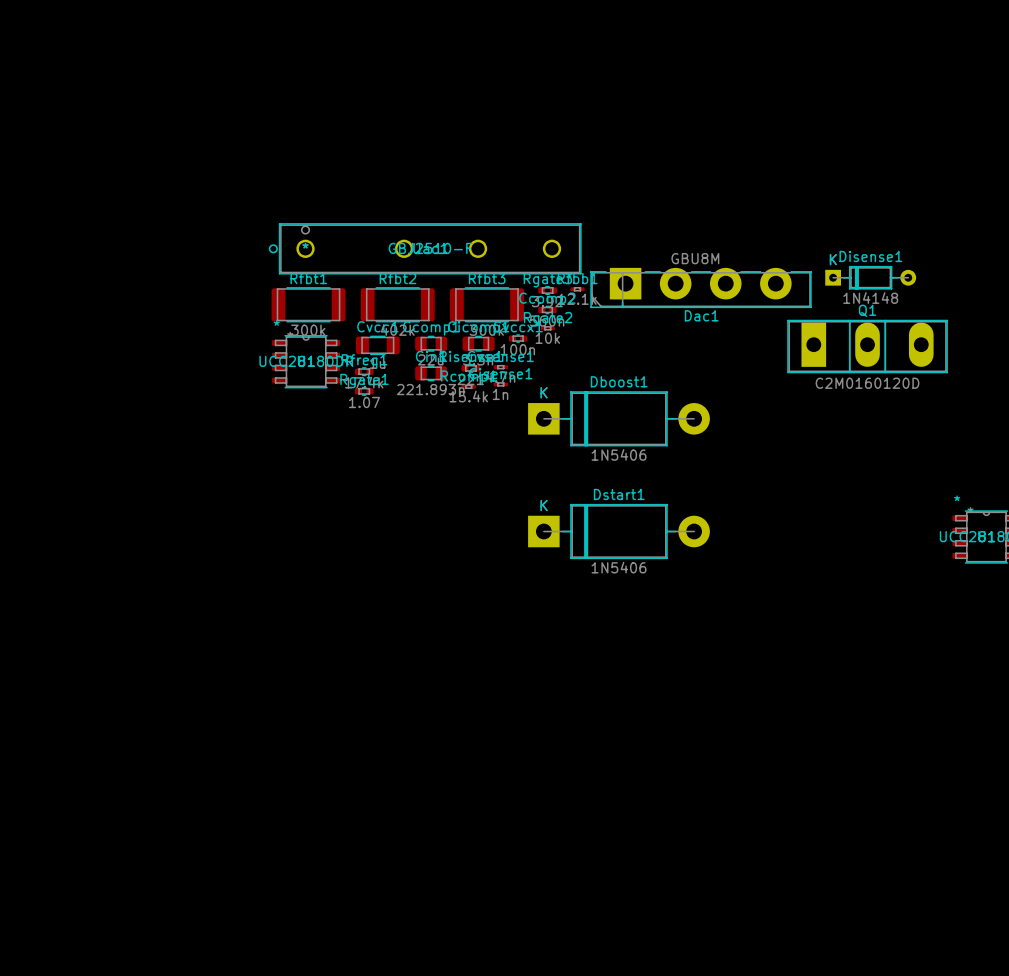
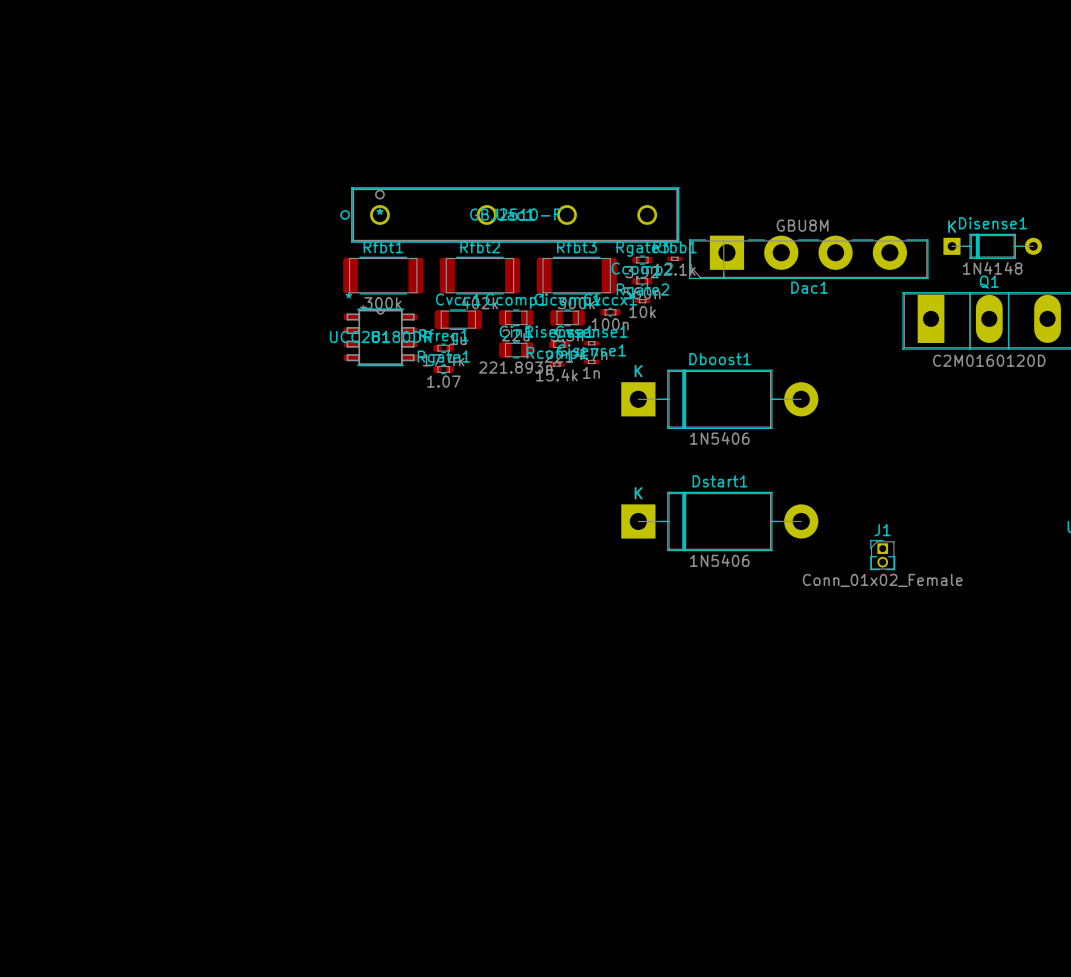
J1: none -> Conn_01x02_Female (882, 555)

